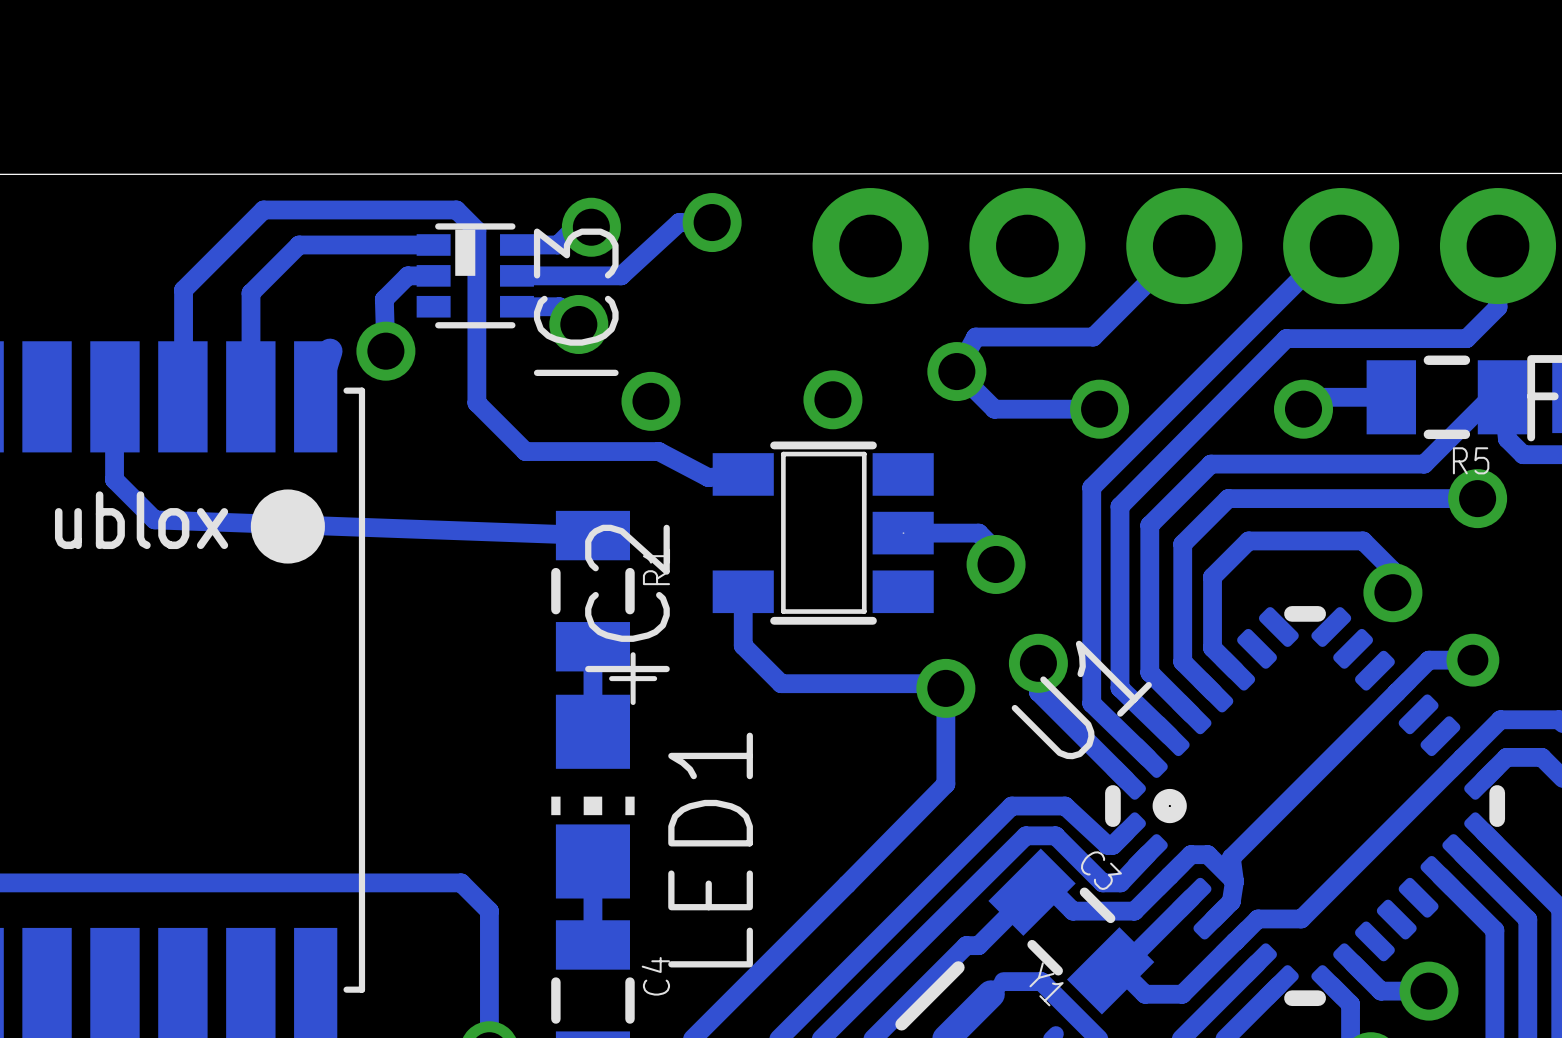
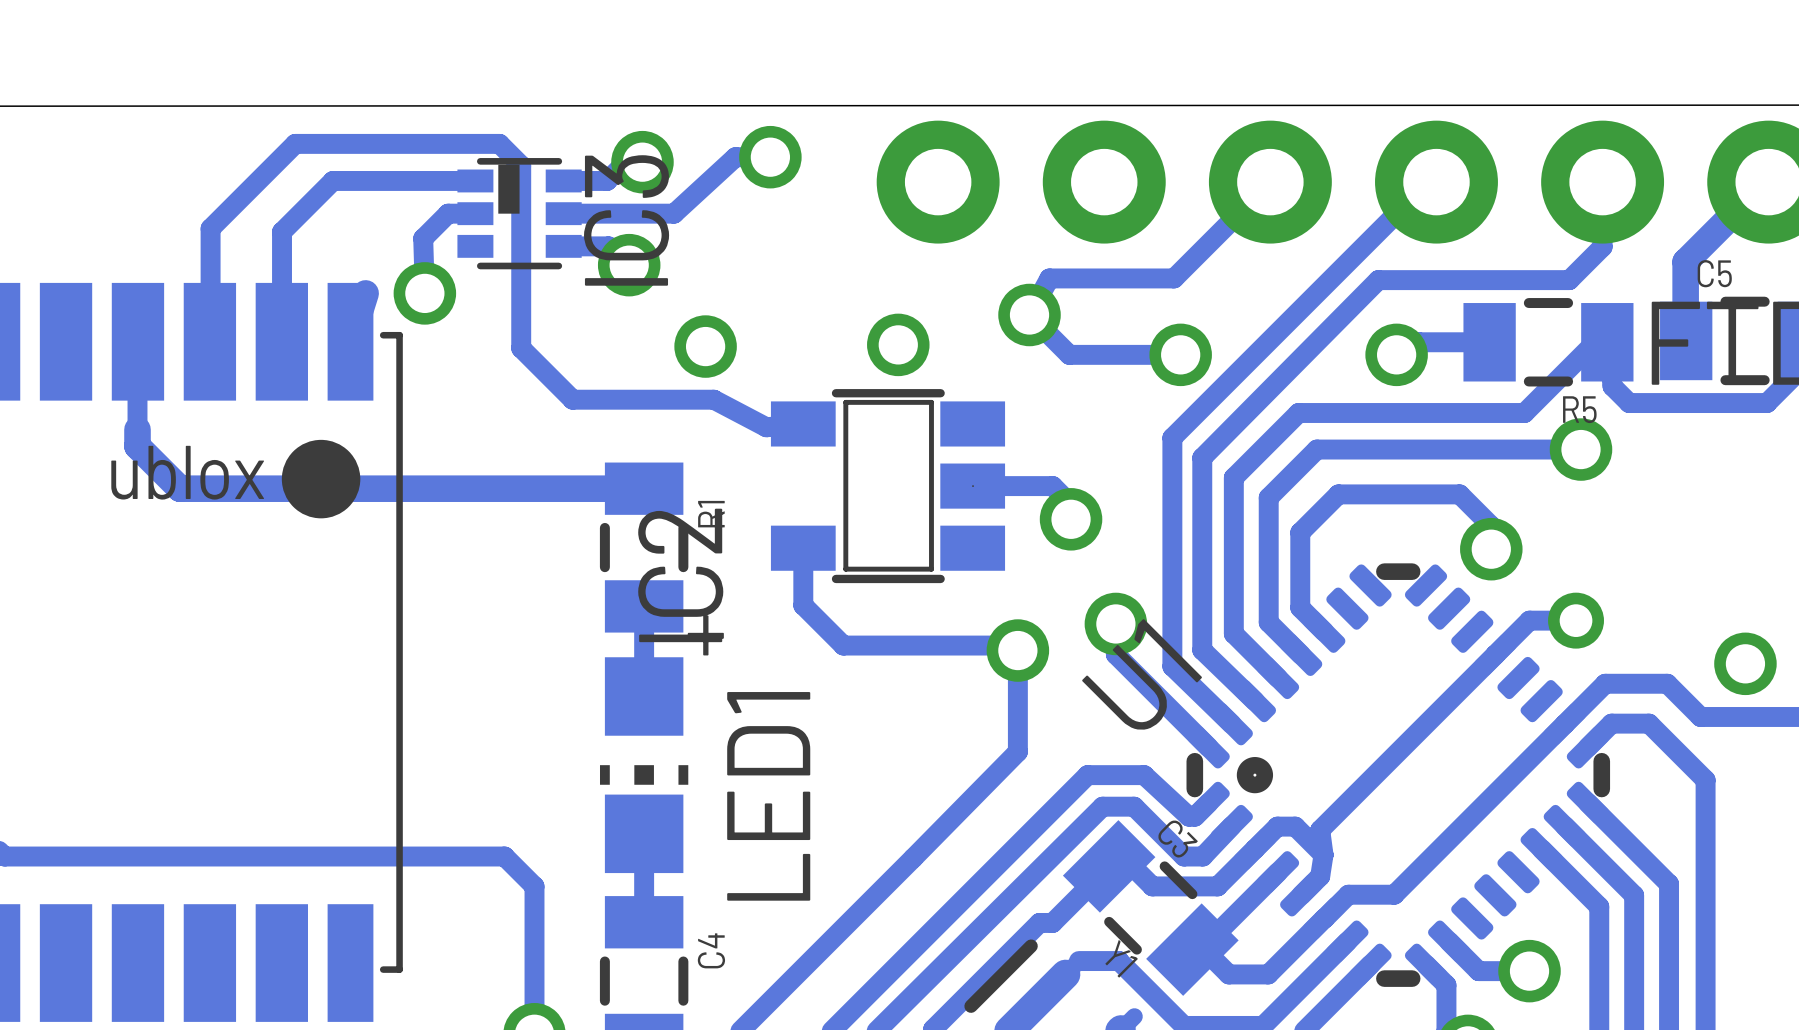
track: (114, 479) (154, 519) (592, 535) -> (137, 429) (137, 446) (179, 488) (644, 488)

